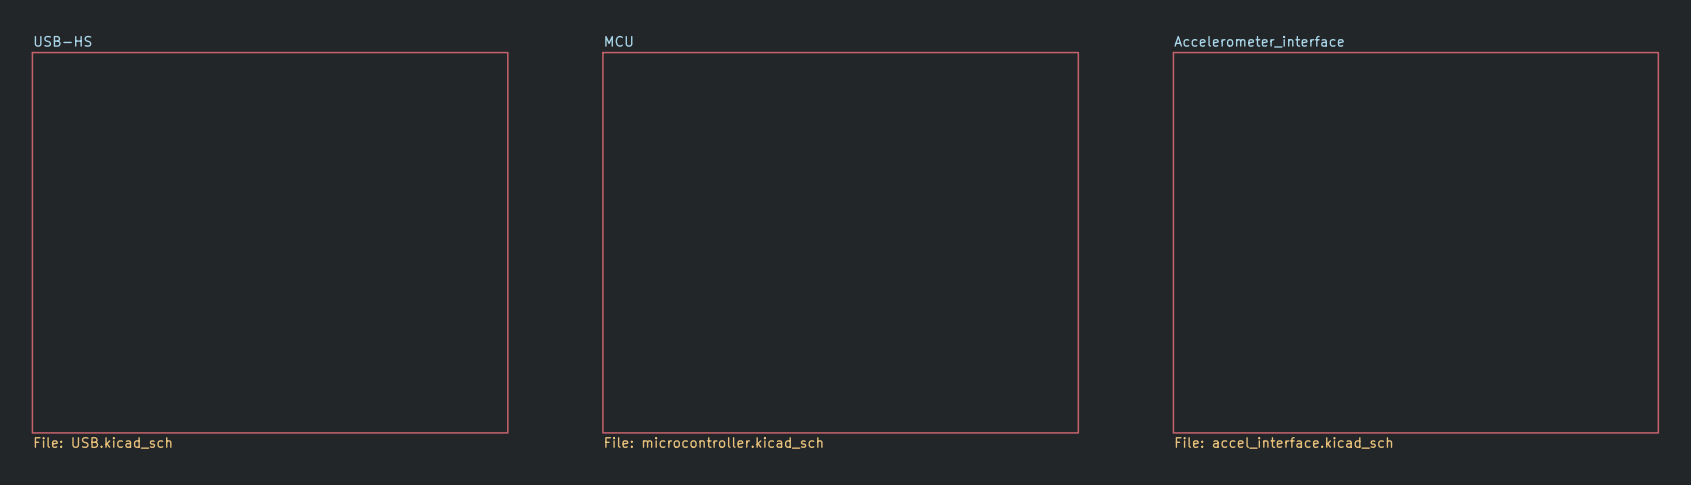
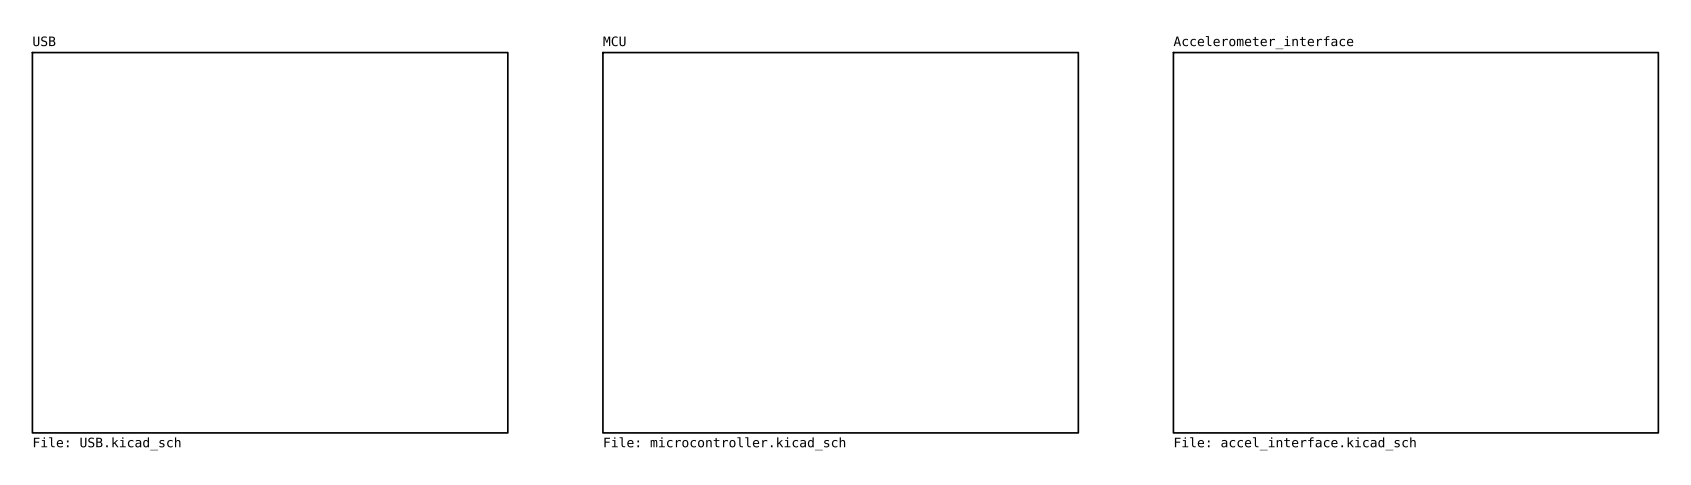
sheet USB-HS name: USB-HS (63, 41) -> USB (44, 41)

